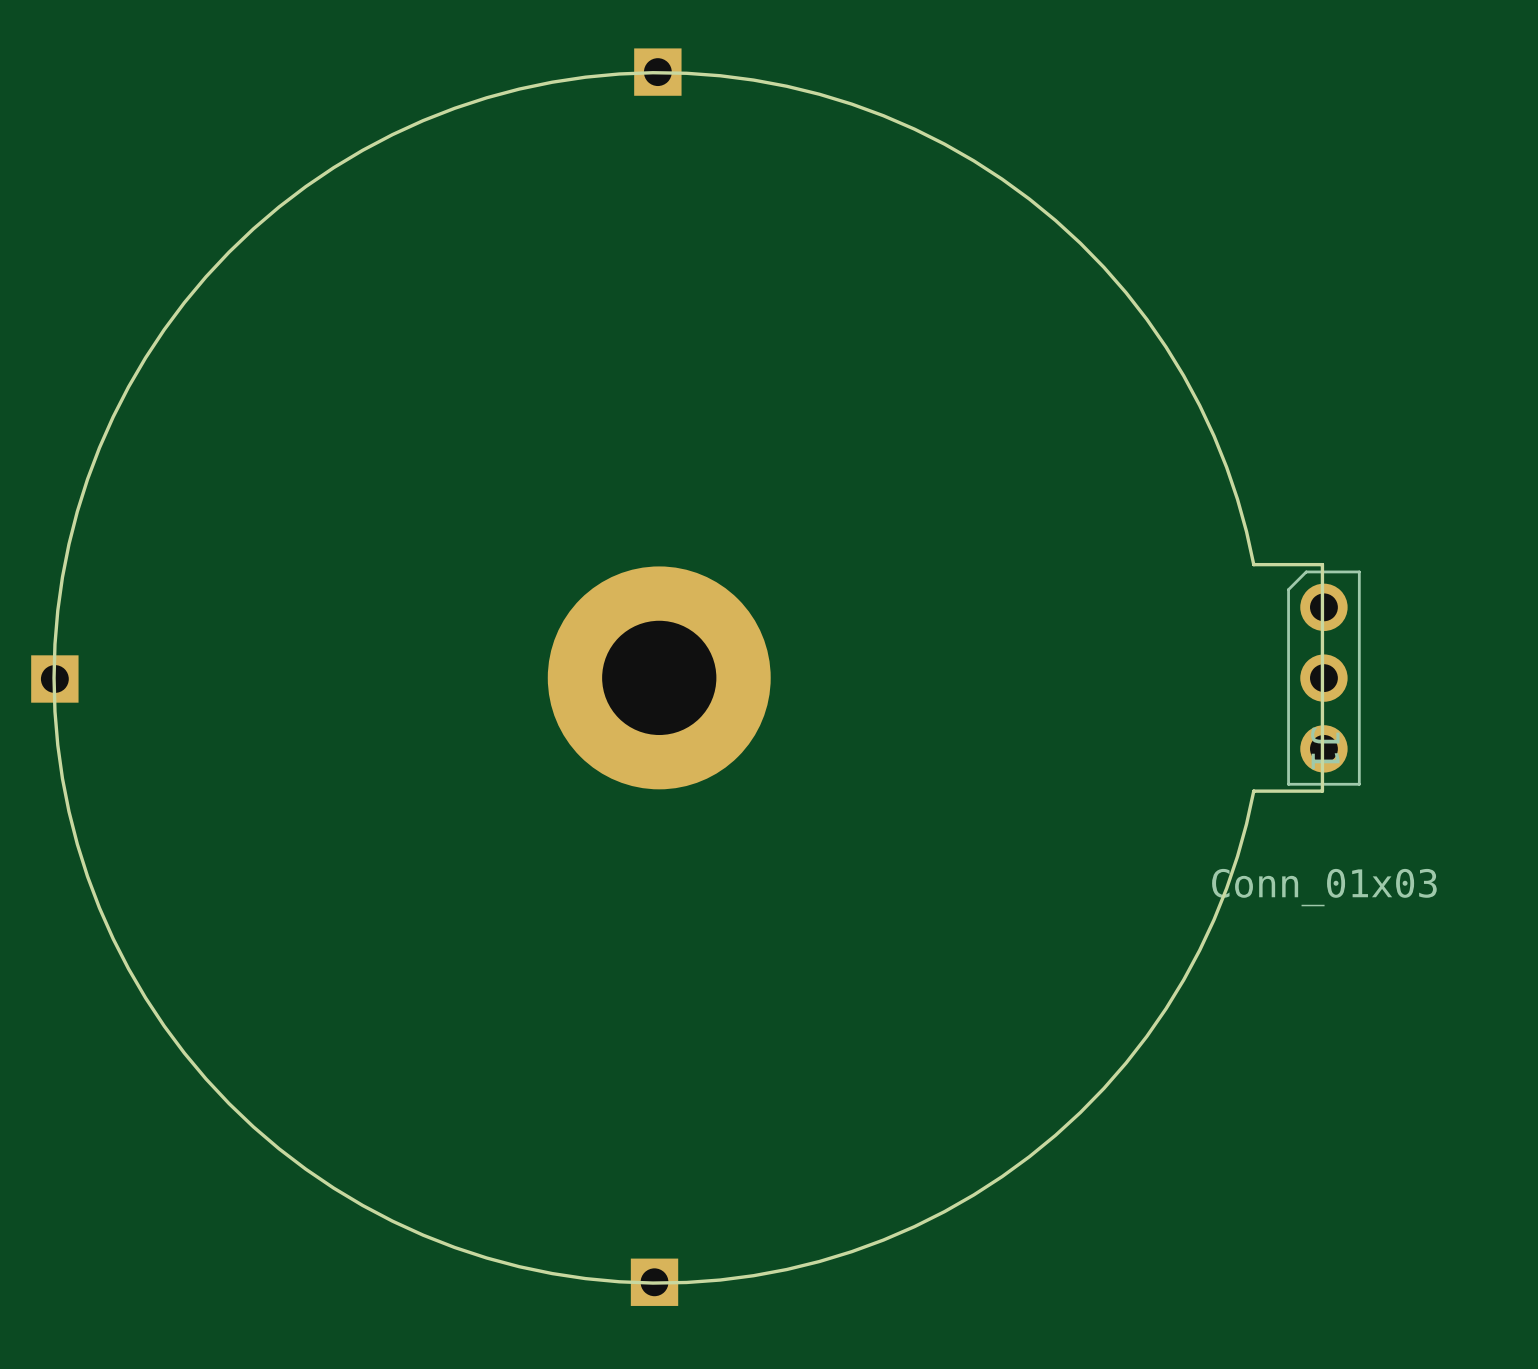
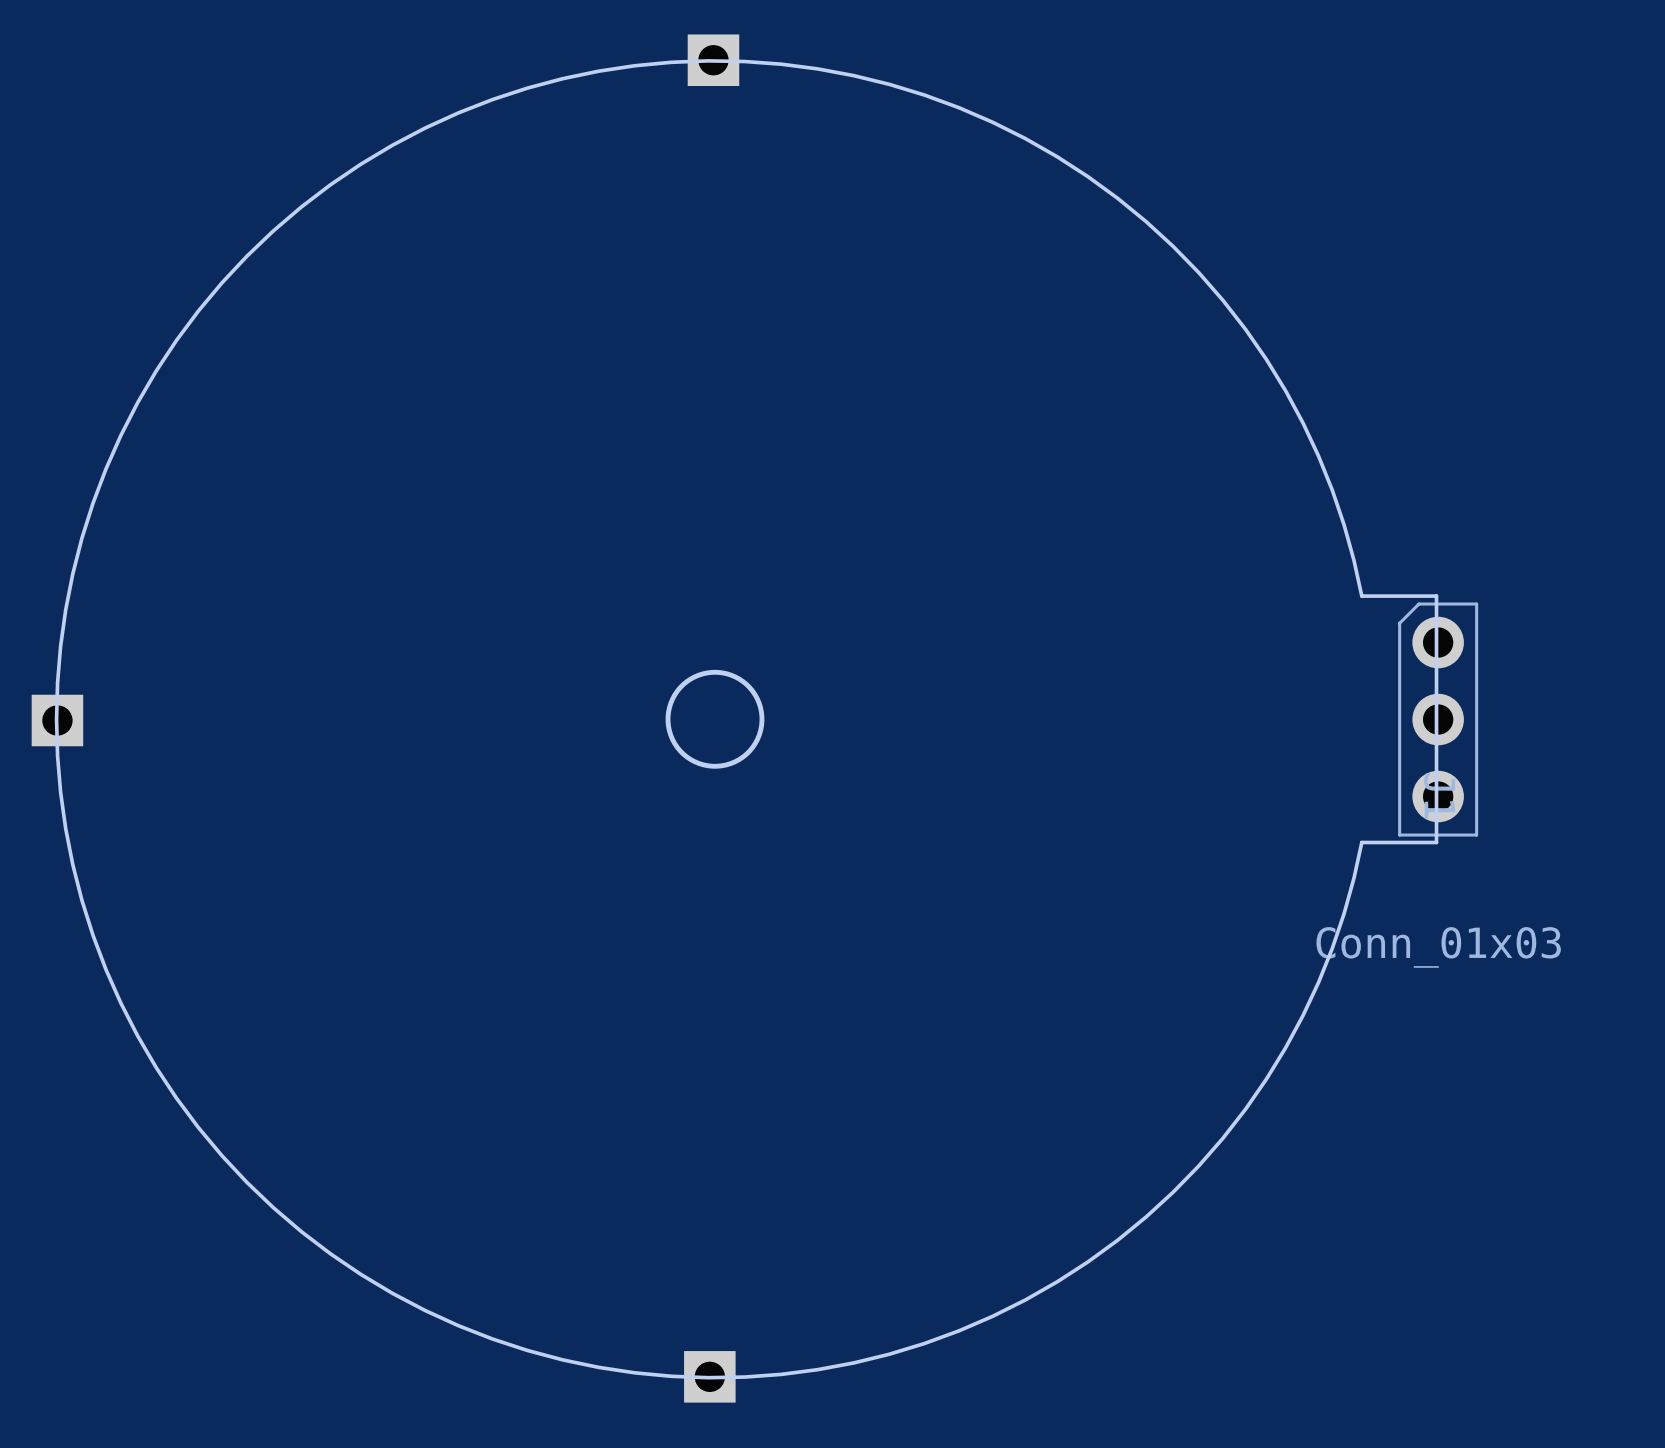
round board edge: none -> [665, 669, 765, 769]
part: (659, 677) -> none

